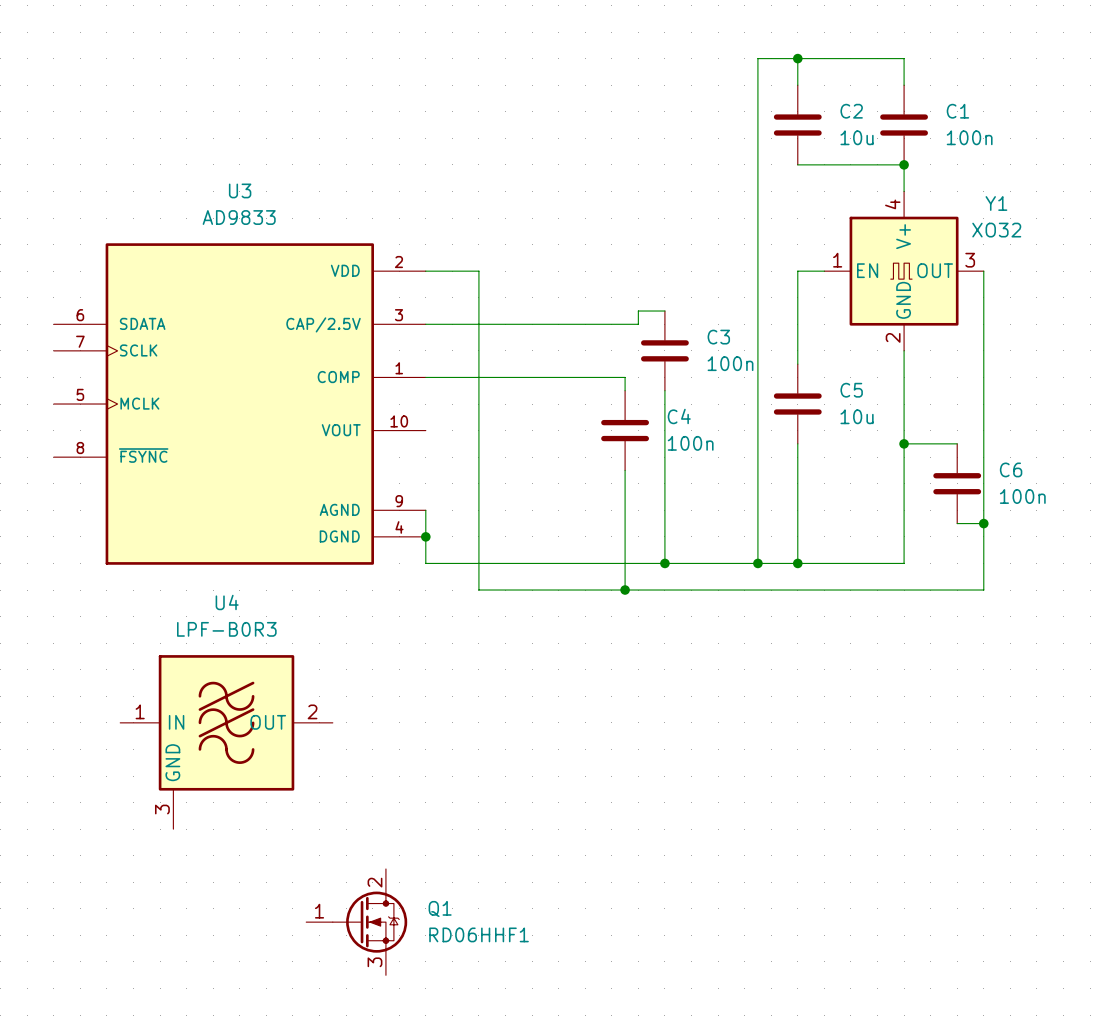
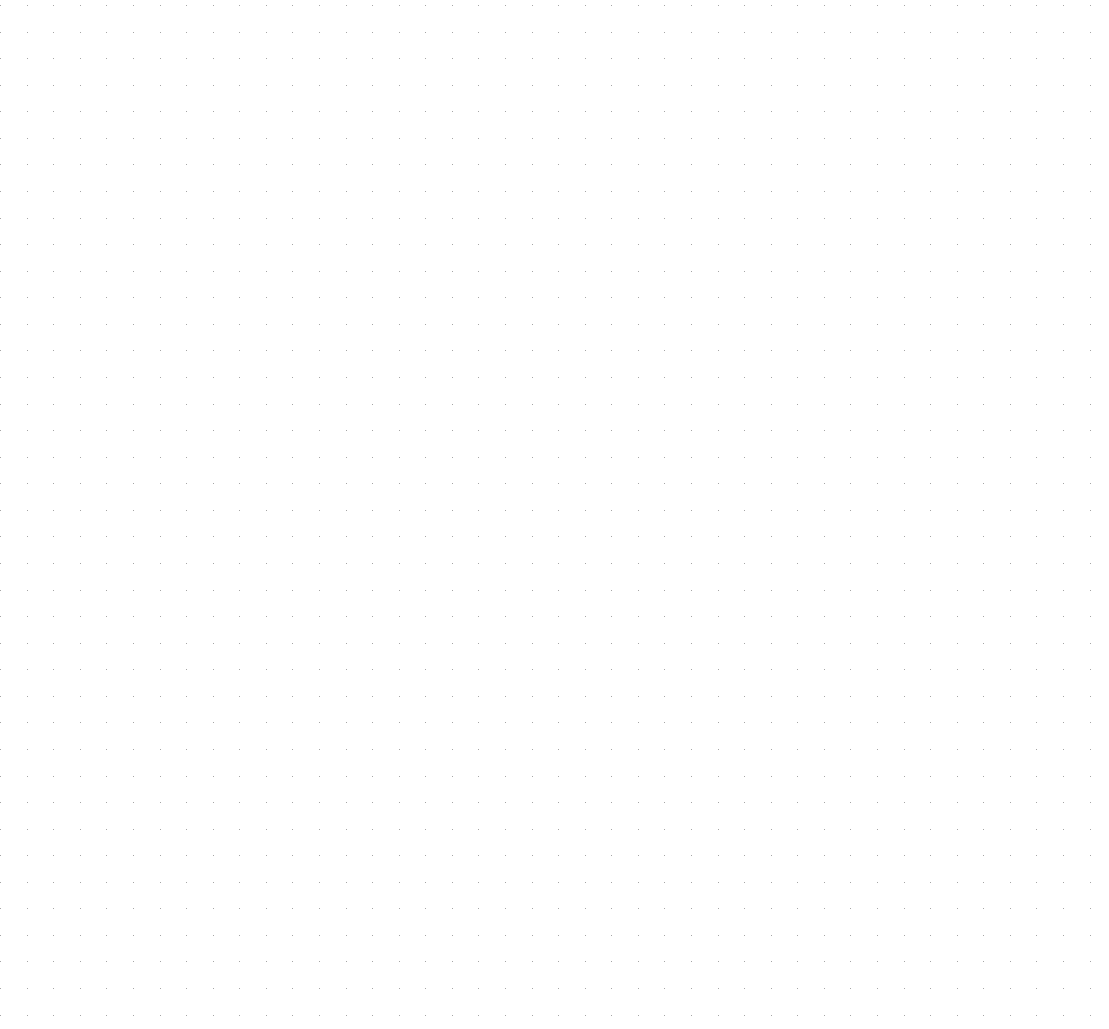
wire: (797, 58) (797, 85) -> none
junction: (797, 58) -> none
wire: (904, 85) (904, 58) (757, 58) (757, 563) -> none
C2: 10u (797, 125) -> none
C1: 100n (904, 125) -> none
wire: (797, 164) (904, 164) (904, 191) -> none
junction: (904, 164) -> none
wire: (425, 271) (478, 271) (478, 590) (983, 590) (983, 271) -> none
wire: (824, 271) (797, 271) (797, 364) -> none
Y1: XO32 (904, 271) -> none
wire: (664, 311) (638, 311) (638, 324) (425, 324) -> none
C3: 100n (664, 350) -> none
wire: (904, 350) (904, 563) (425, 563) (425, 510) -> none
wire: (425, 377) (625, 377) (625, 390) -> none
wire: (664, 390) (664, 563) -> none
U3: AD9833 (239, 404) -> none
C5: 10u (797, 404) -> none
C4: 100n (625, 430) -> none
wire: (797, 443) (797, 563) -> none
wire: (904, 443) (957, 443) -> none
junction: (904, 443) -> none
wire: (625, 470) (625, 590) -> none
C6: 100n (957, 483) -> none
wire: (957, 523) (983, 523) -> none
junction: (983, 523) -> none
junction: (425, 536) -> none
junction: (664, 563) -> none
junction: (757, 563) -> none
junction: (797, 563) -> none
junction: (625, 590) -> none
U4: LPF-B0R3 (226, 742) -> none
Q1: RD06HHF1 (356, 922) -> none

